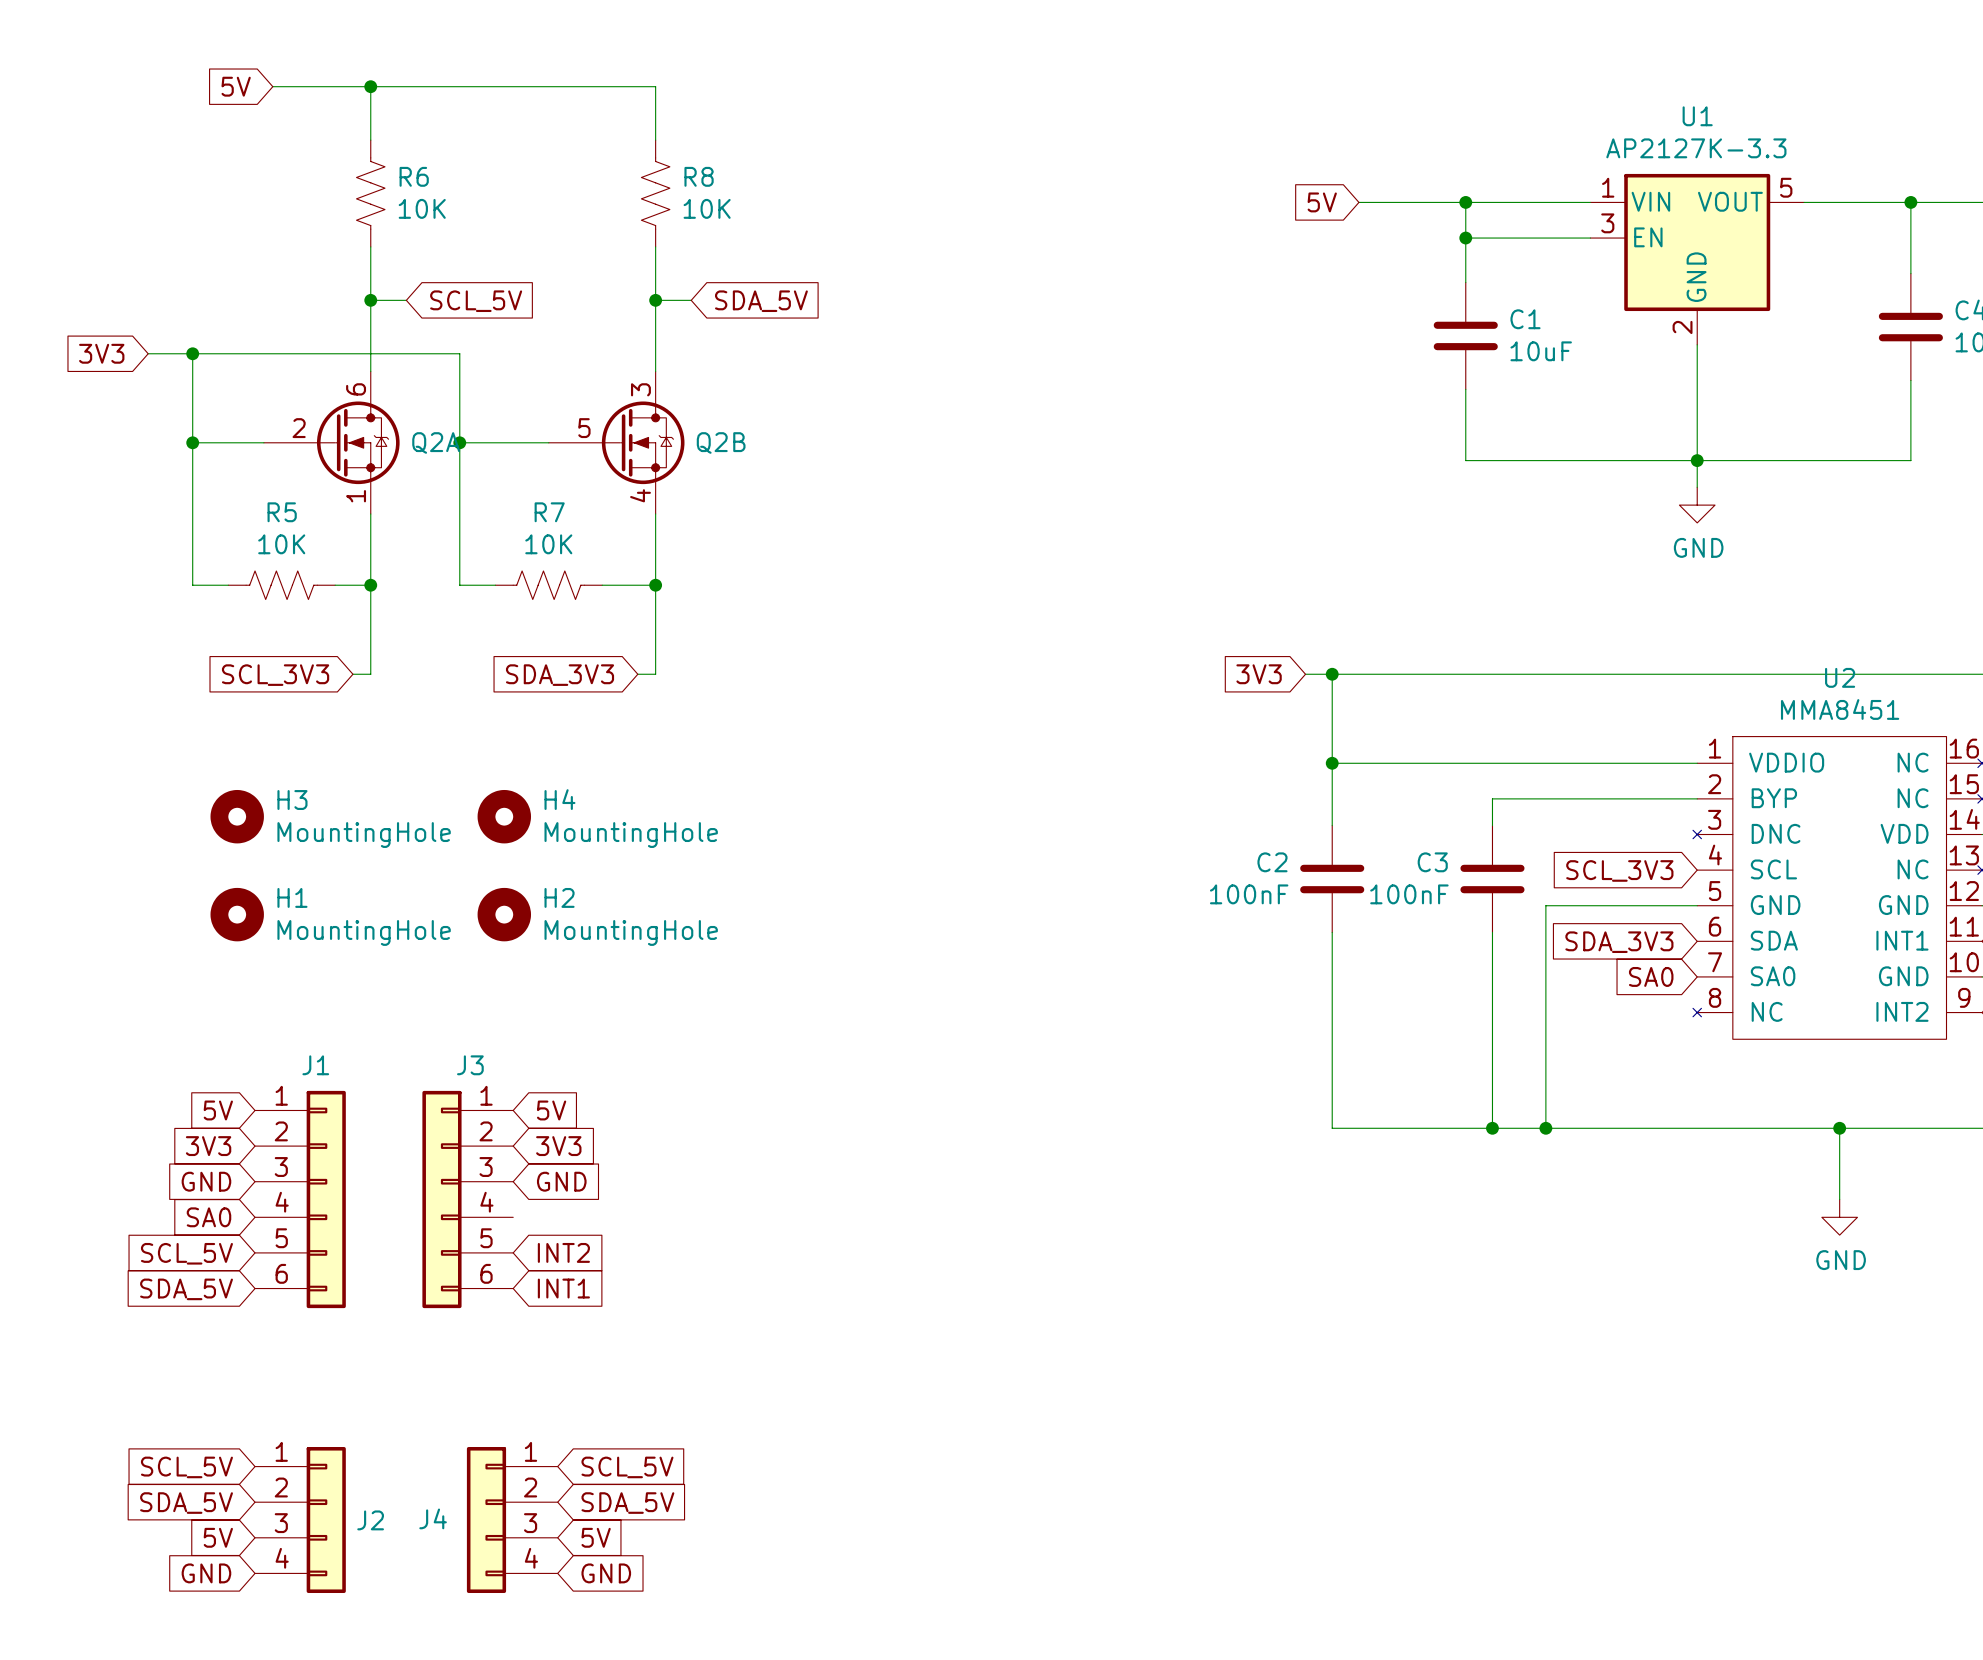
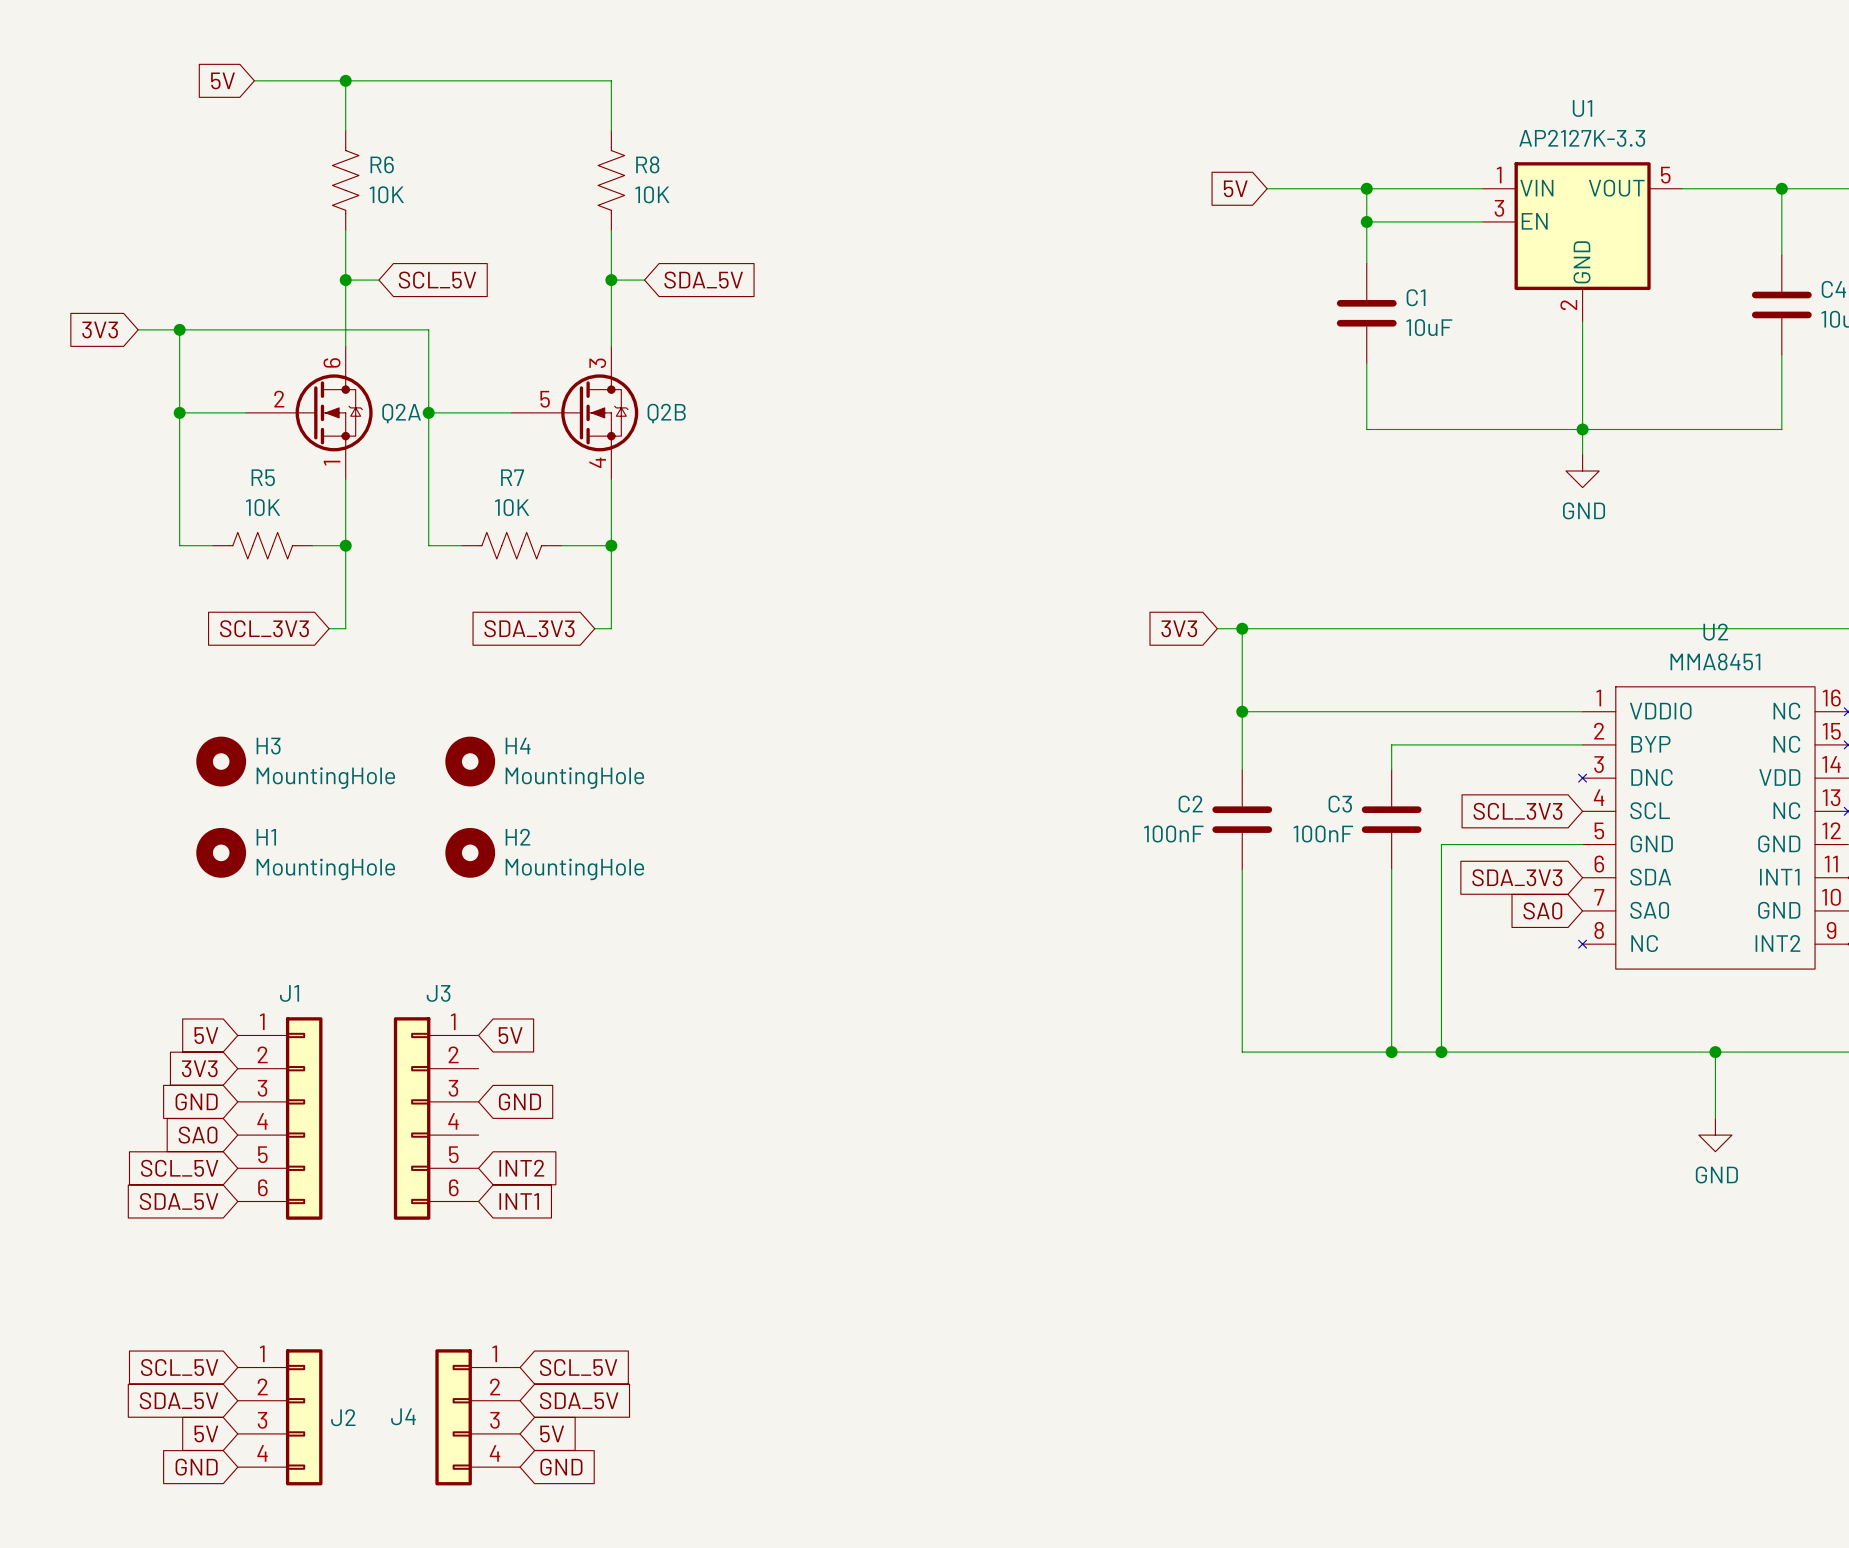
global label: 3V3 (558, 1146) -> none

